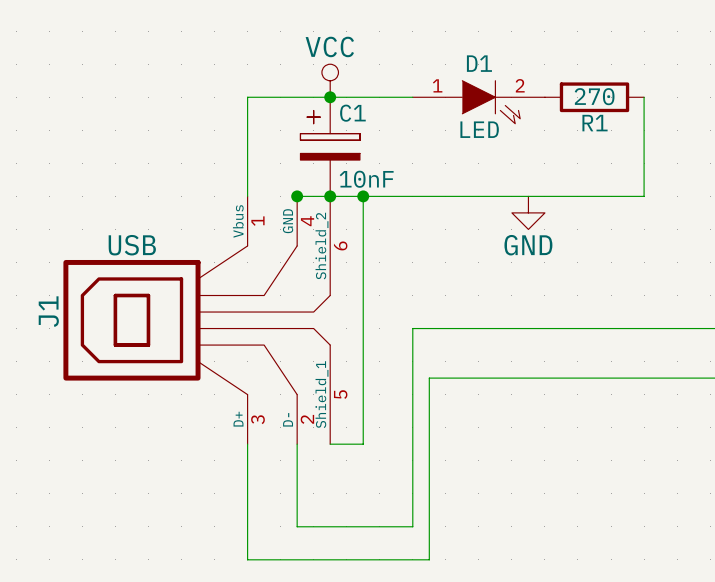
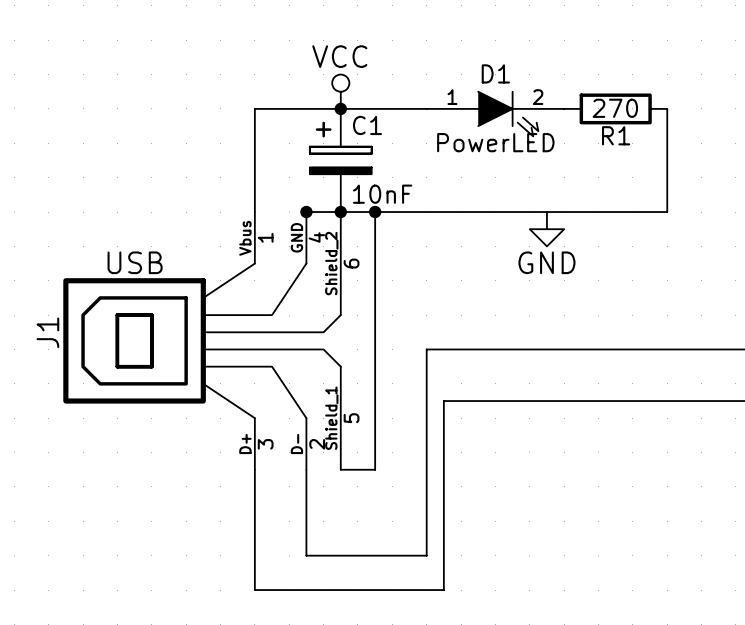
D1 value: LED (479, 129) -> PowerLED (495, 142)

